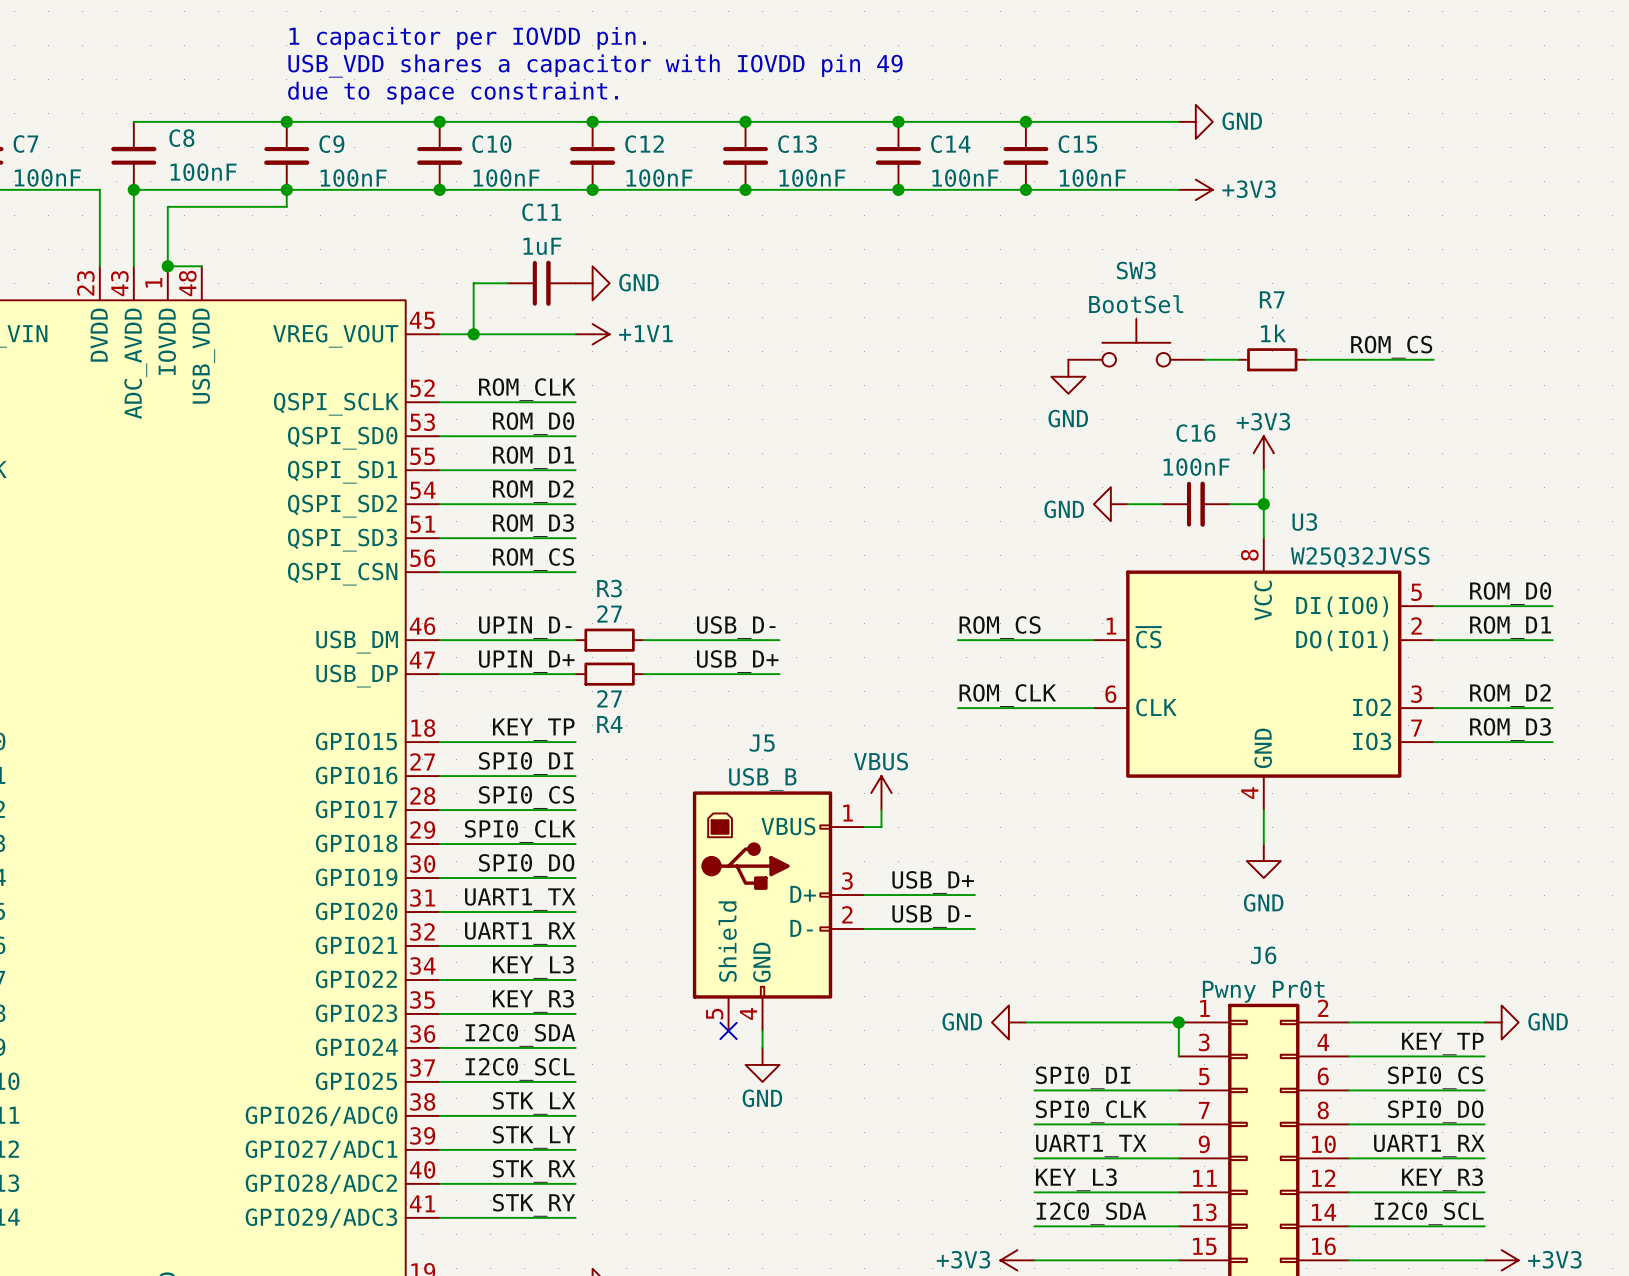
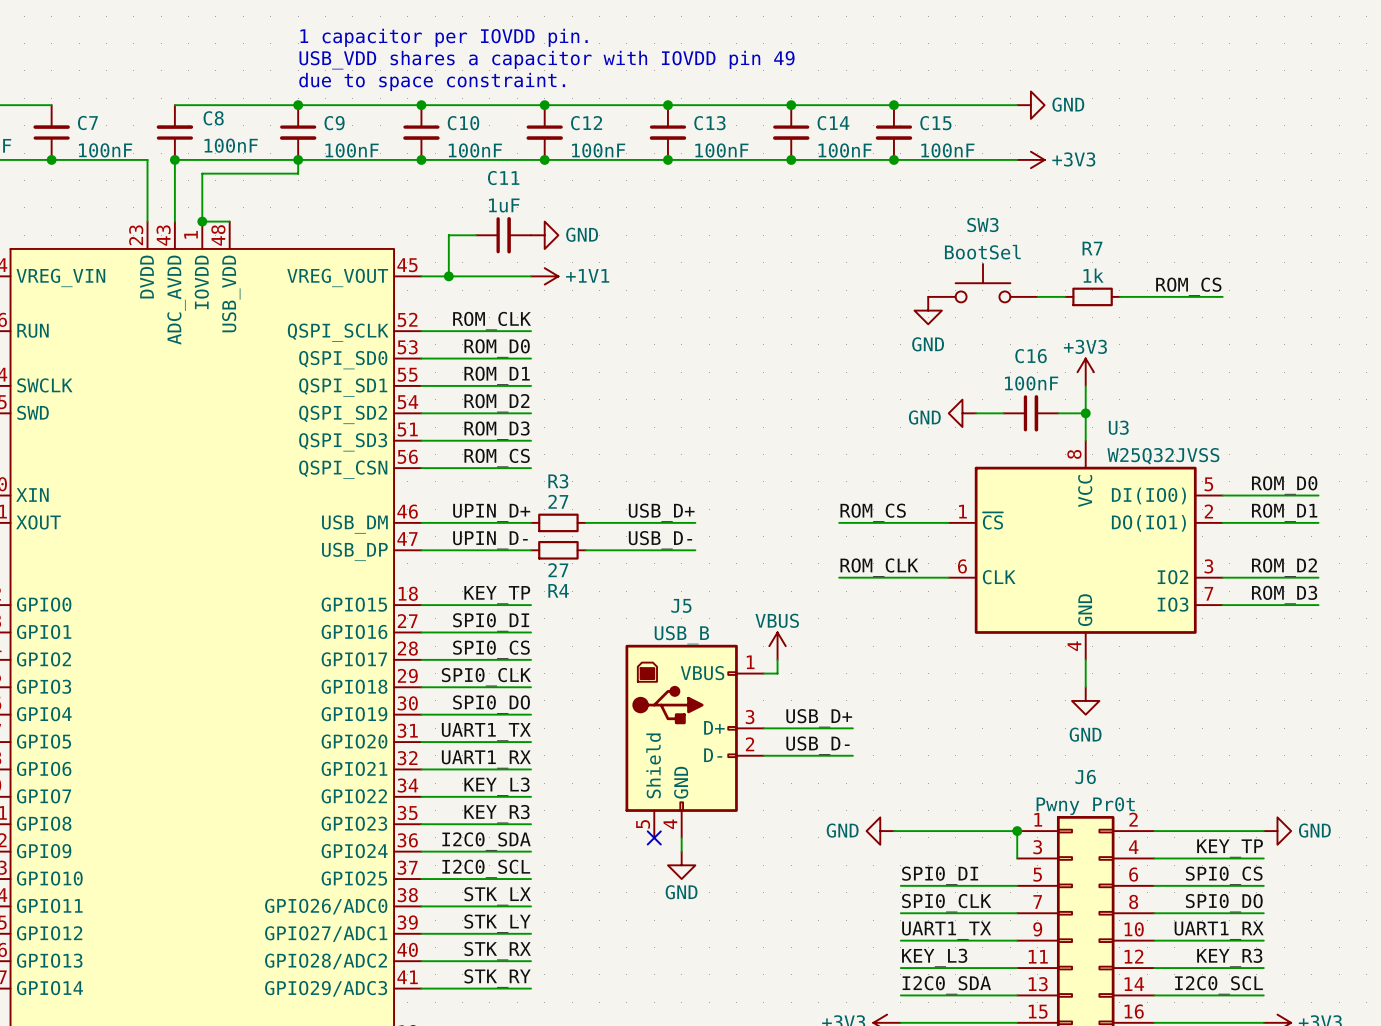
label: UPIN_D- (525, 627) -> UPIN_D+ (491, 512)
label: USB_D- (736, 627) -> USB_D+ (661, 512)
label: UPIN_D+ (526, 661) -> UPIN_D- (490, 540)
label: USB_D+ (737, 661) -> USB_D- (660, 540)

